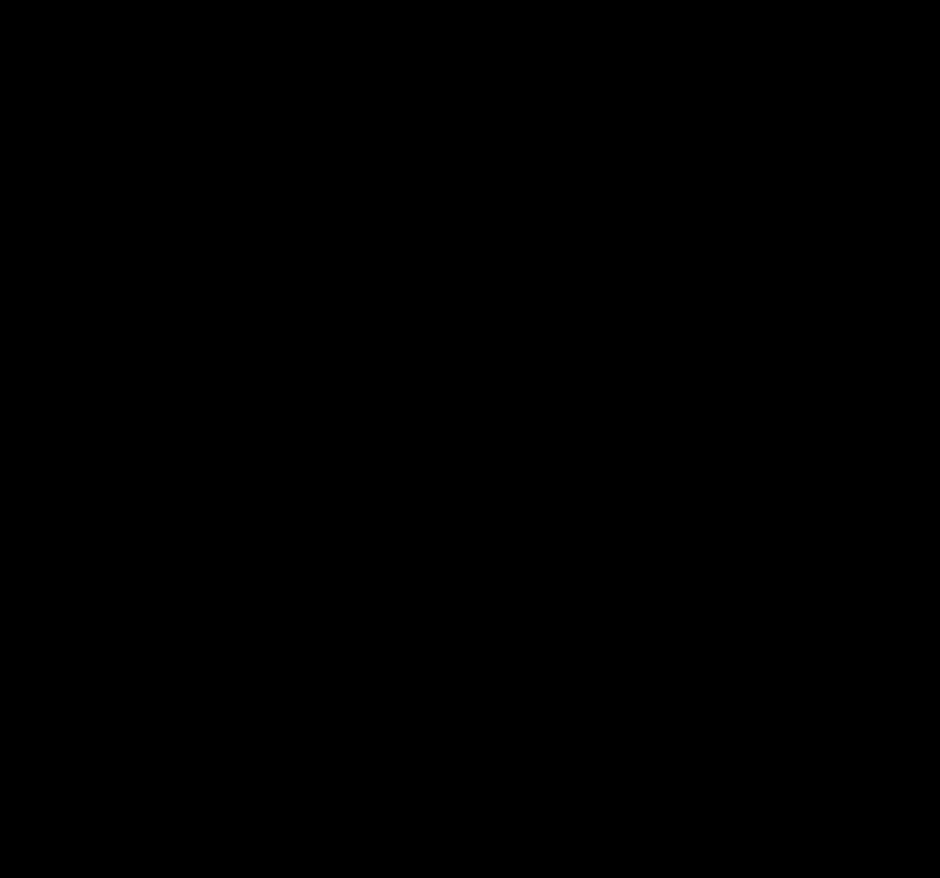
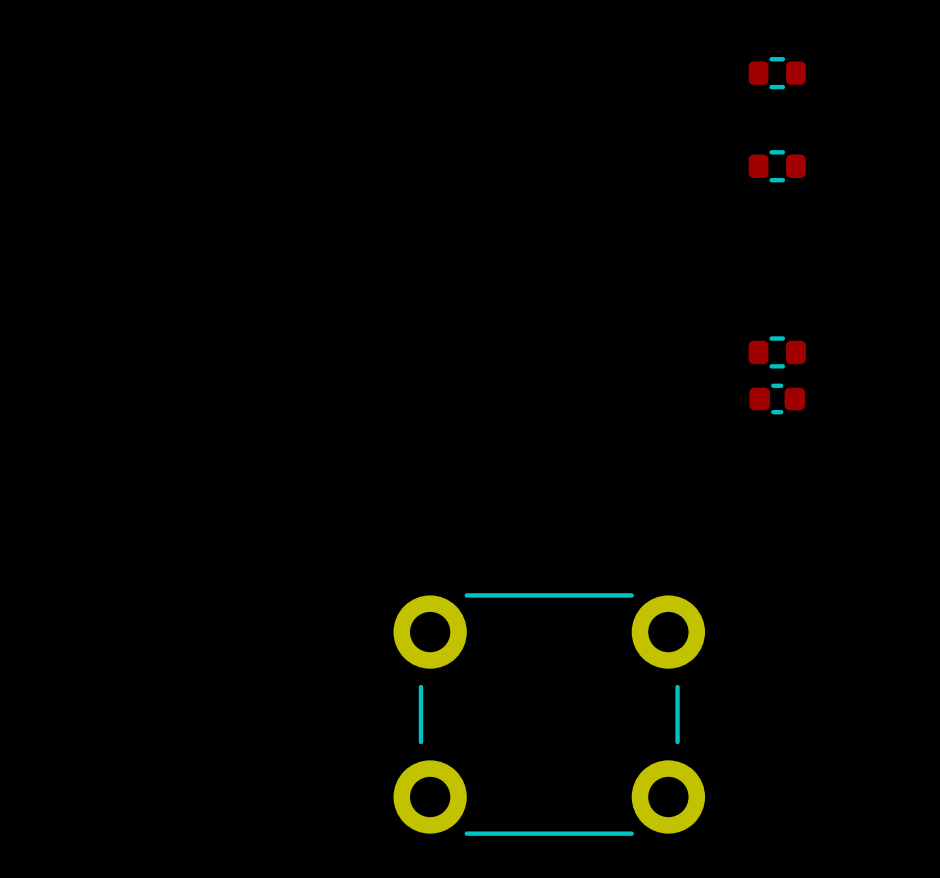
part: none -> (777, 73)
part: none -> (777, 166)
part: none -> (777, 352)
part: none -> (777, 398)
part: none -> (549, 714)

